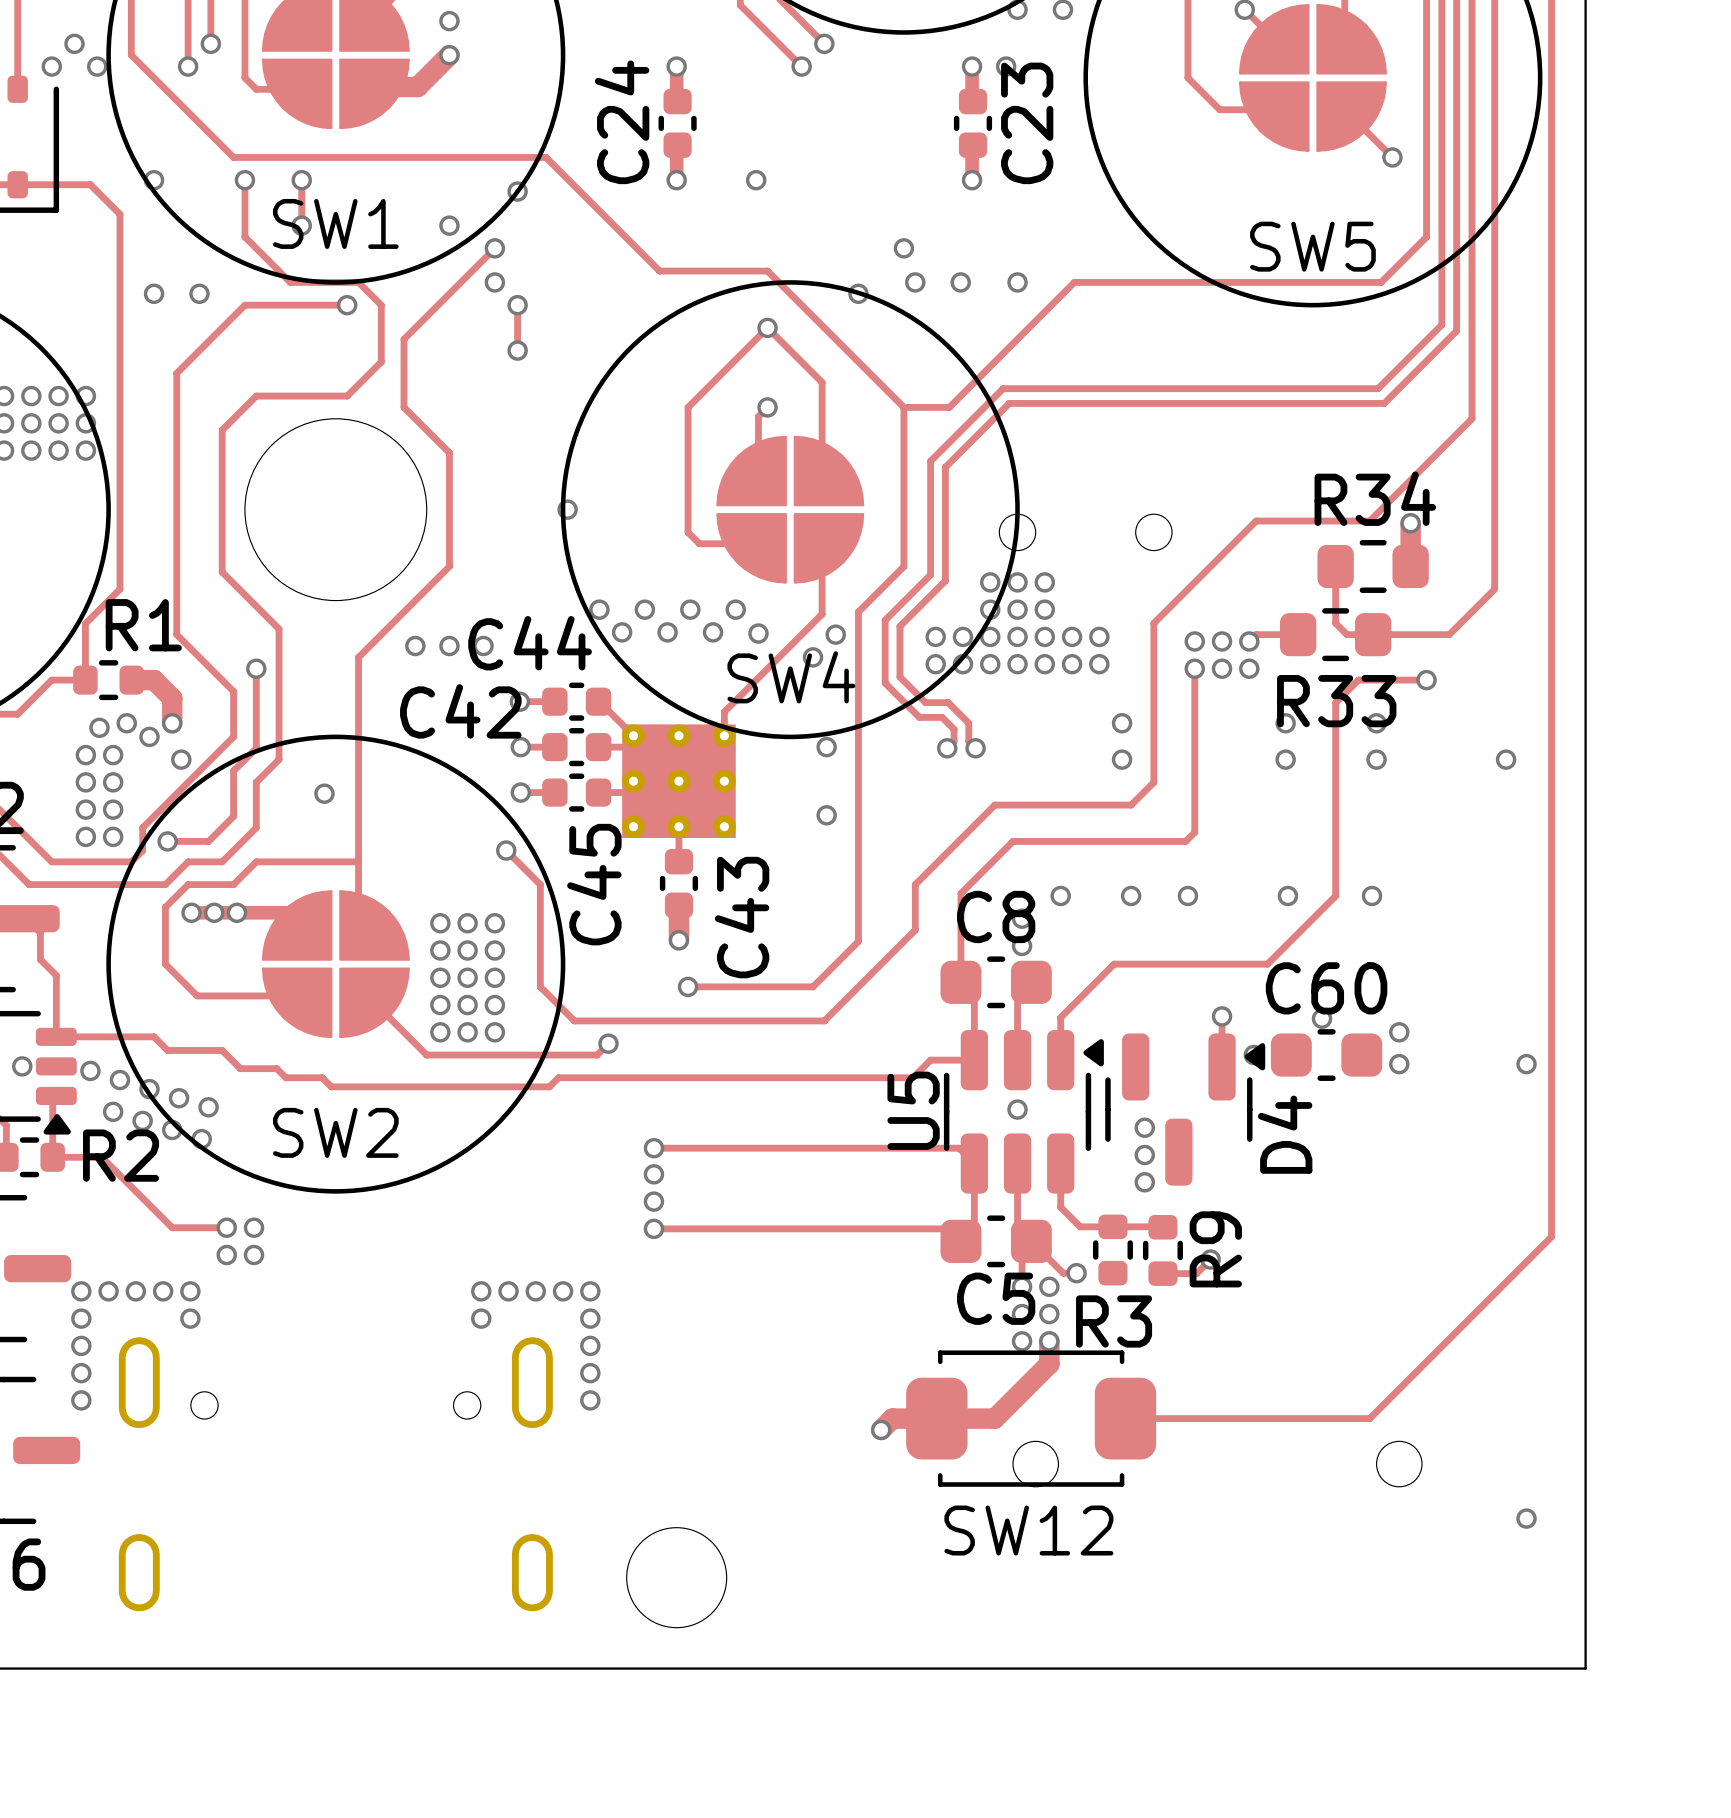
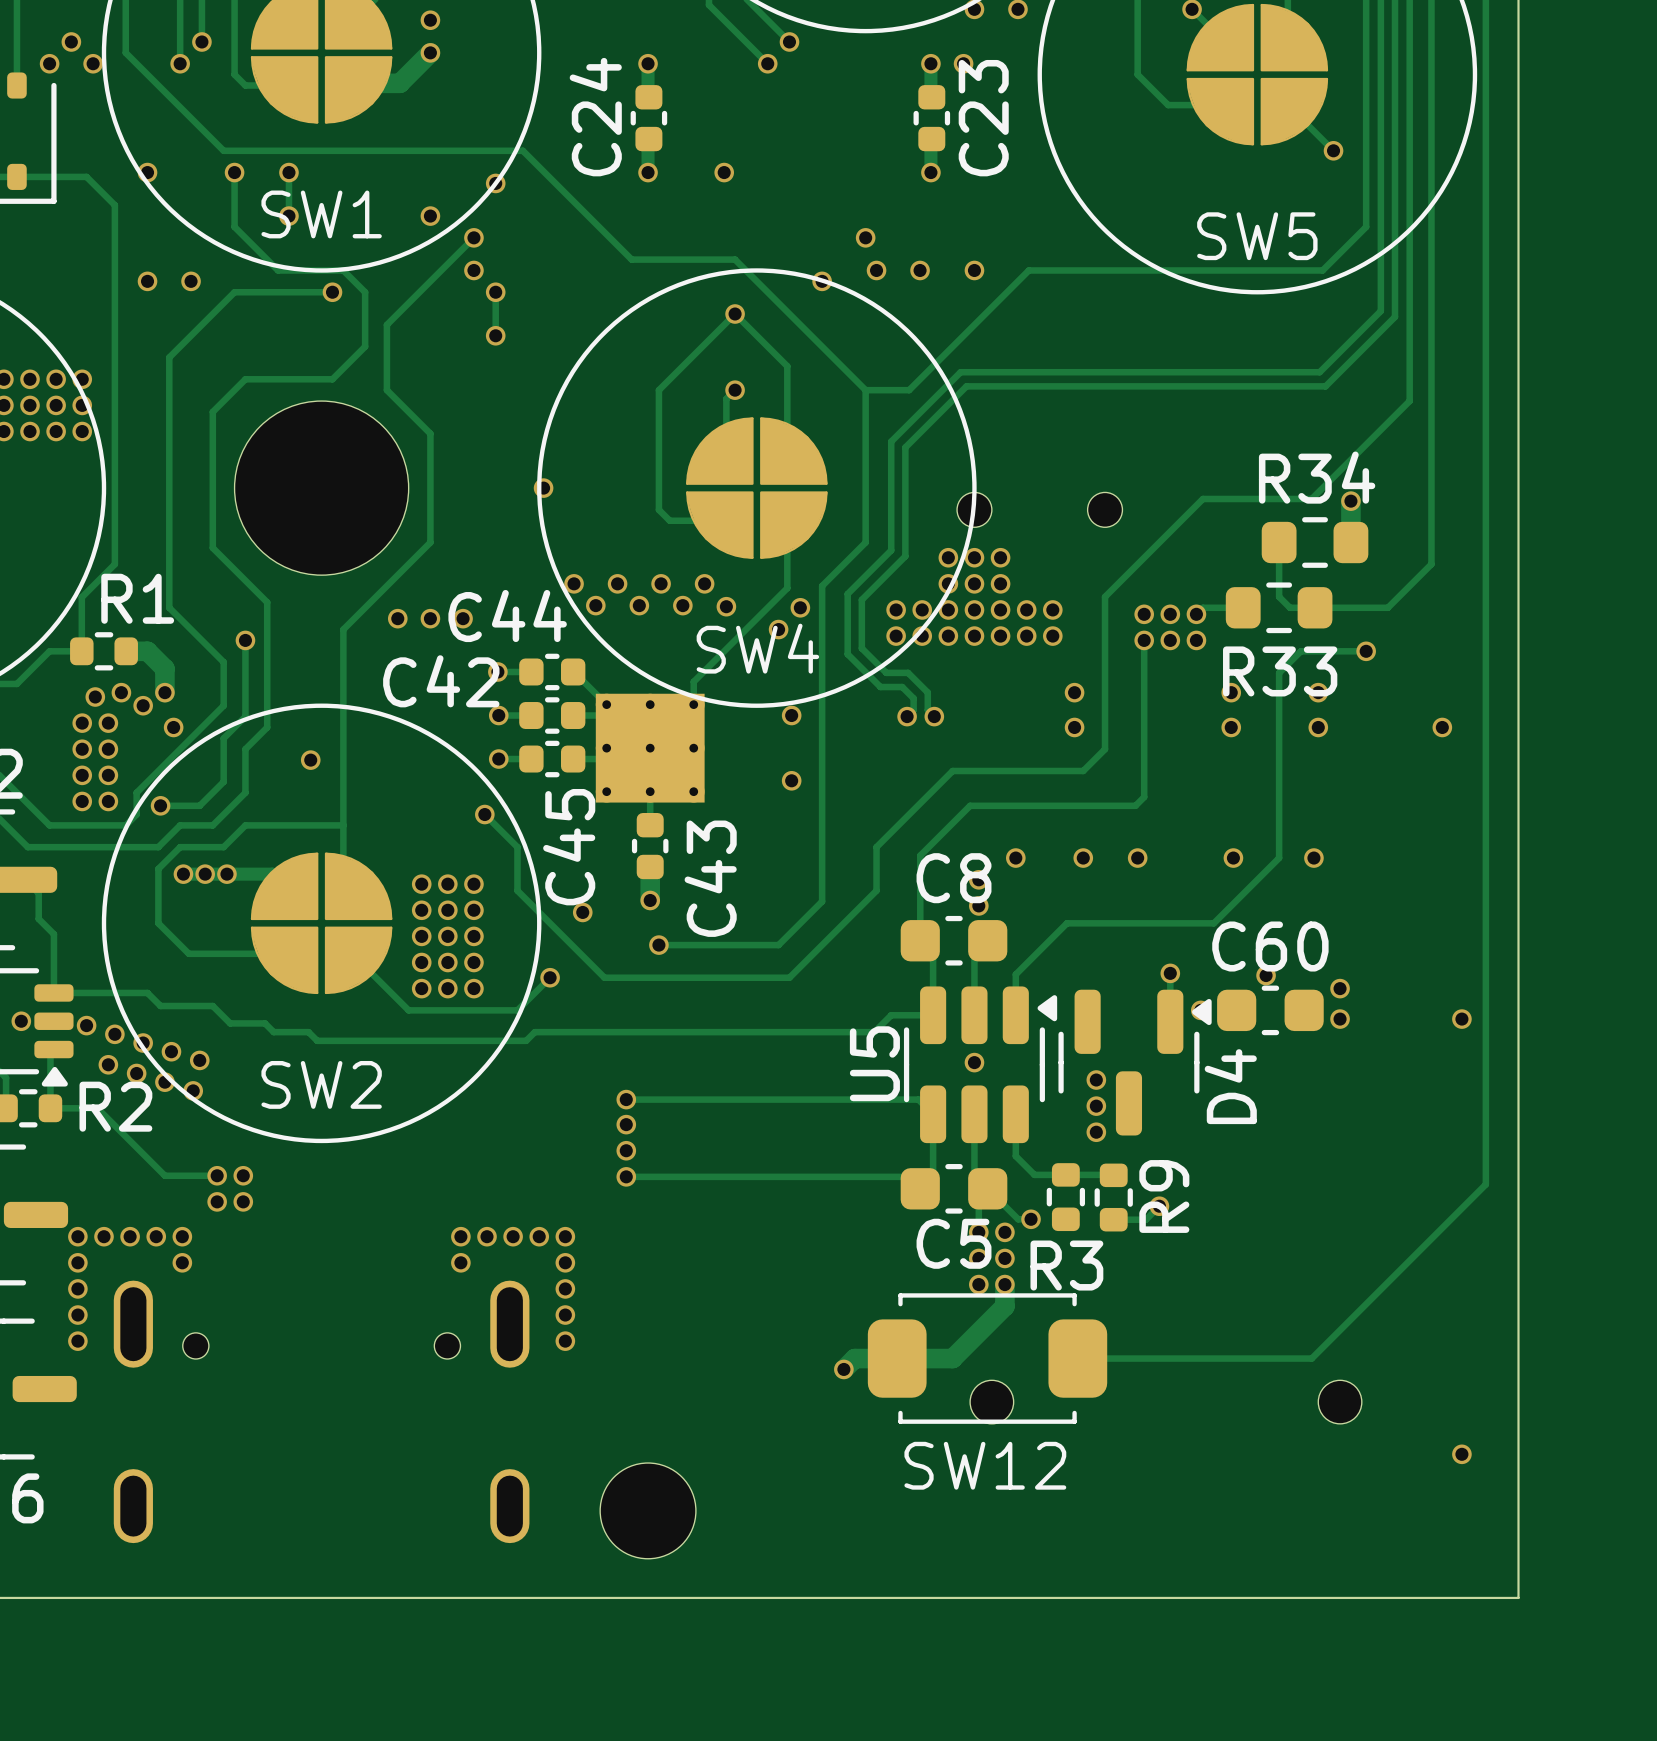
track: (540, 930) (540, 986) (574, 1020) (631, 1020) -> (517, 890) (604, 977)
via: none -> (582, 912)
track: (608, 1043) (597, 1055) (540, 1055) -> (550, 977) (517, 1010)
via position: (608, 1043) -> (550, 977)

